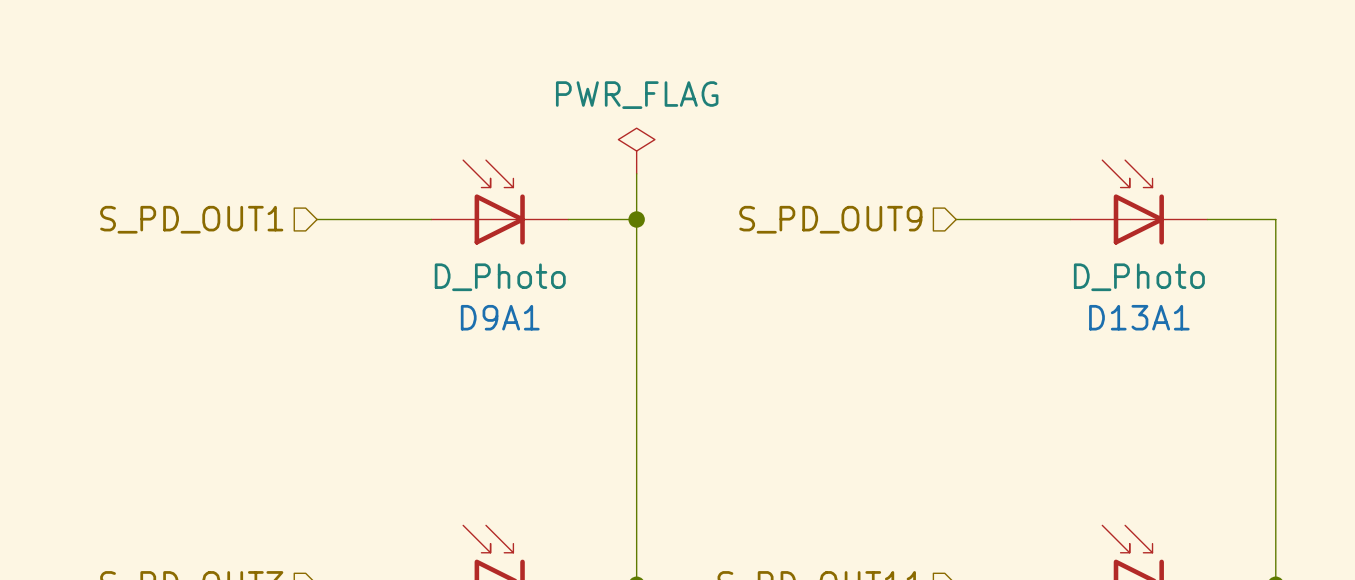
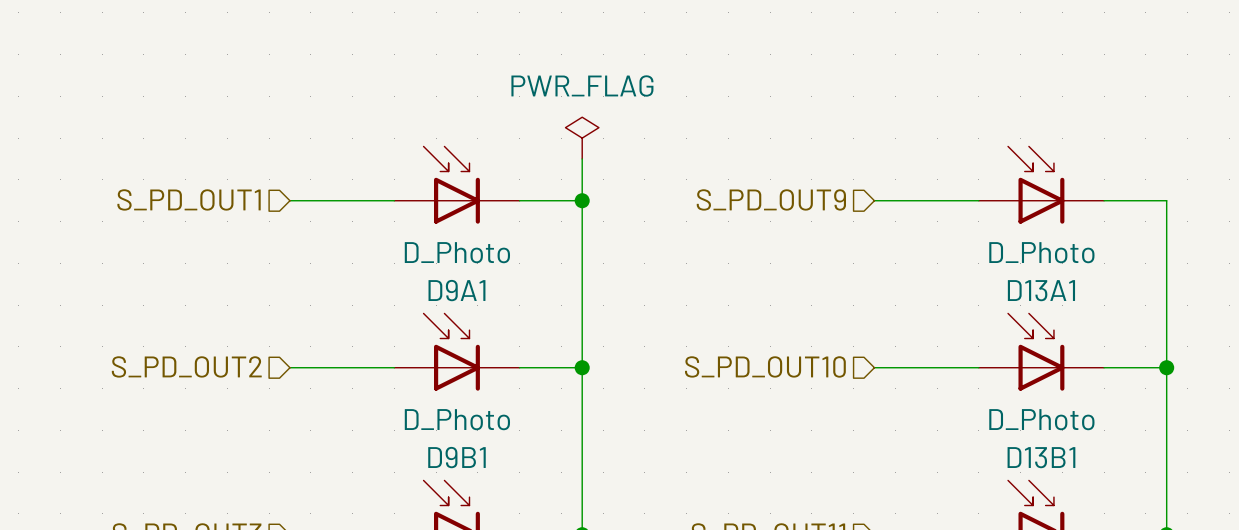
D9B1: none -> D_Photo (456, 352)
D13B1: none -> D_Photo (1041, 352)
hierarchical label: none -> S_PD_OUT2 (186, 366)
wire: none -> (289, 367) (394, 367)
wire: none -> (519, 367) (582, 367)
junction: none -> (582, 367)
hierarchical label: none -> S_PD_OUT10 (765, 366)
wire: none -> (874, 367) (978, 367)
wire: none -> (1104, 367) (1166, 367)
junction: none -> (1166, 367)

